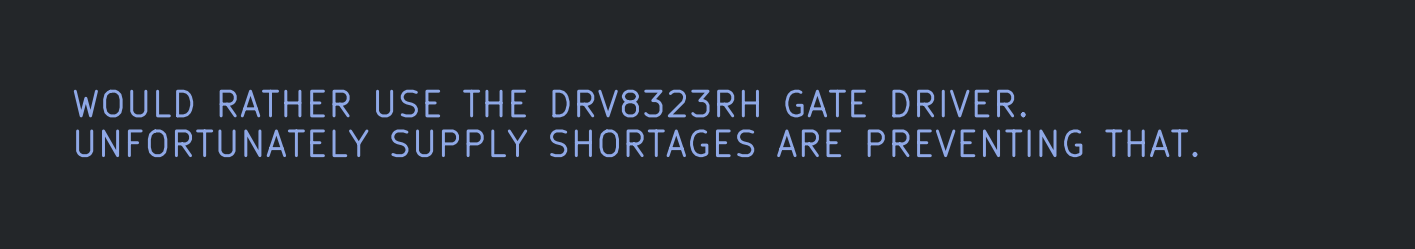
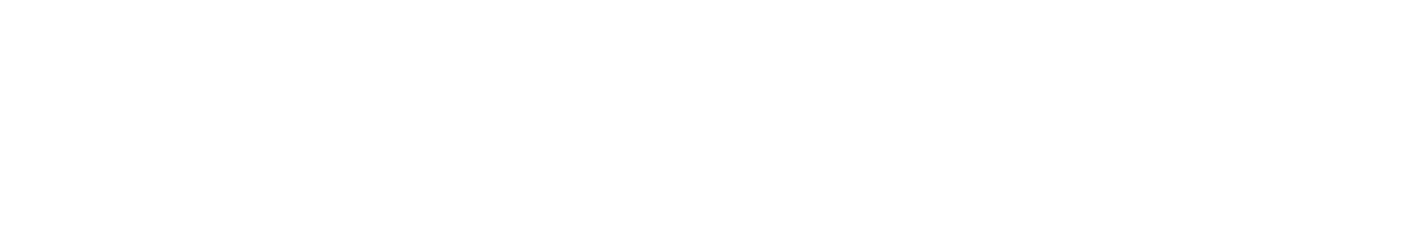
text: WOULD RATHER USE THE DRV8323RH GATE DRIVER. (549, 103) -> none
text: UNFORTUNATELY SUPPLY SHORTAGES ARE PREVENTING THAT. (636, 143) -> none

